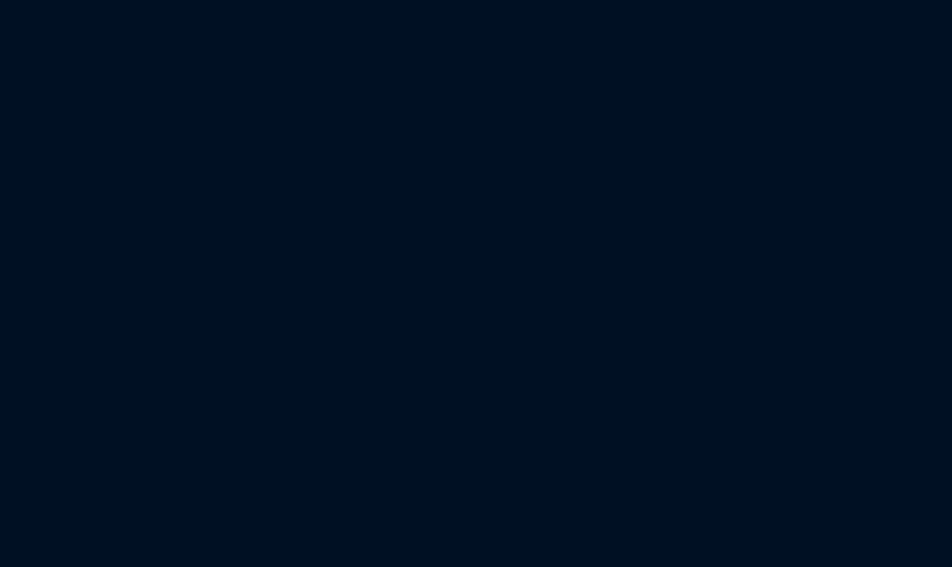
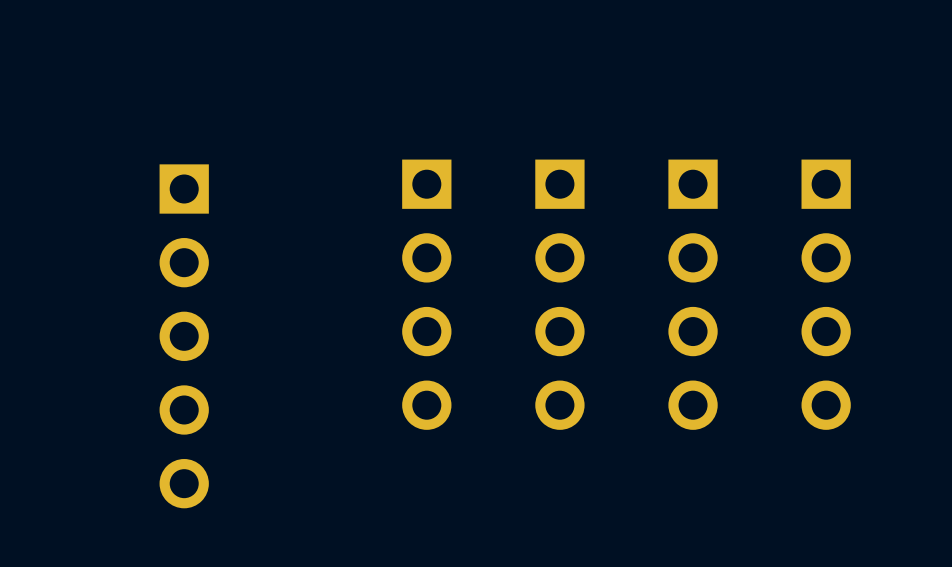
part: none -> (426, 294)
part: none -> (559, 294)
part: none -> (693, 294)
part: none -> (826, 294)
part: none -> (184, 336)

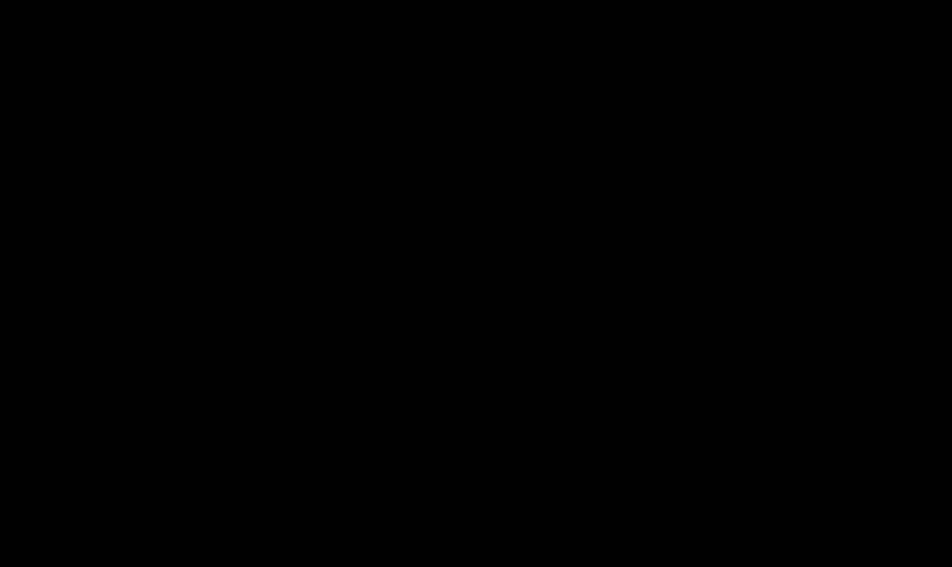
part: (426, 294) -> none
part: (559, 294) -> none
part: (693, 294) -> none
part: (826, 294) -> none
part: (184, 336) -> none

